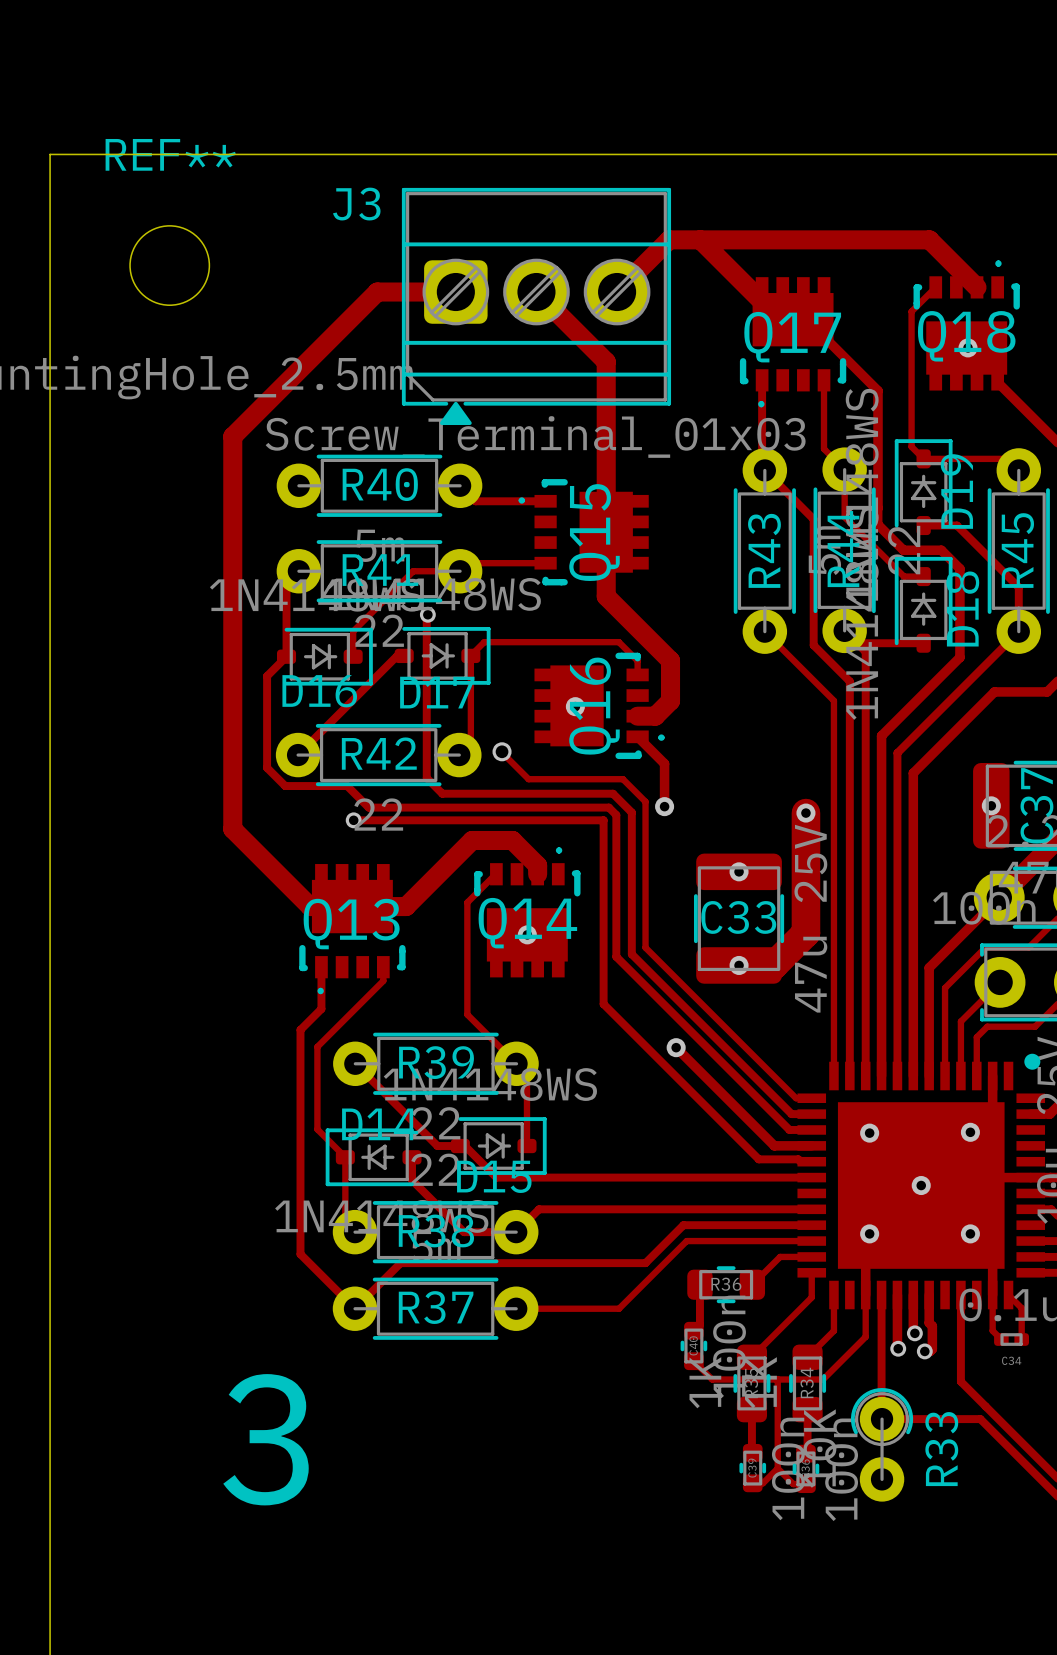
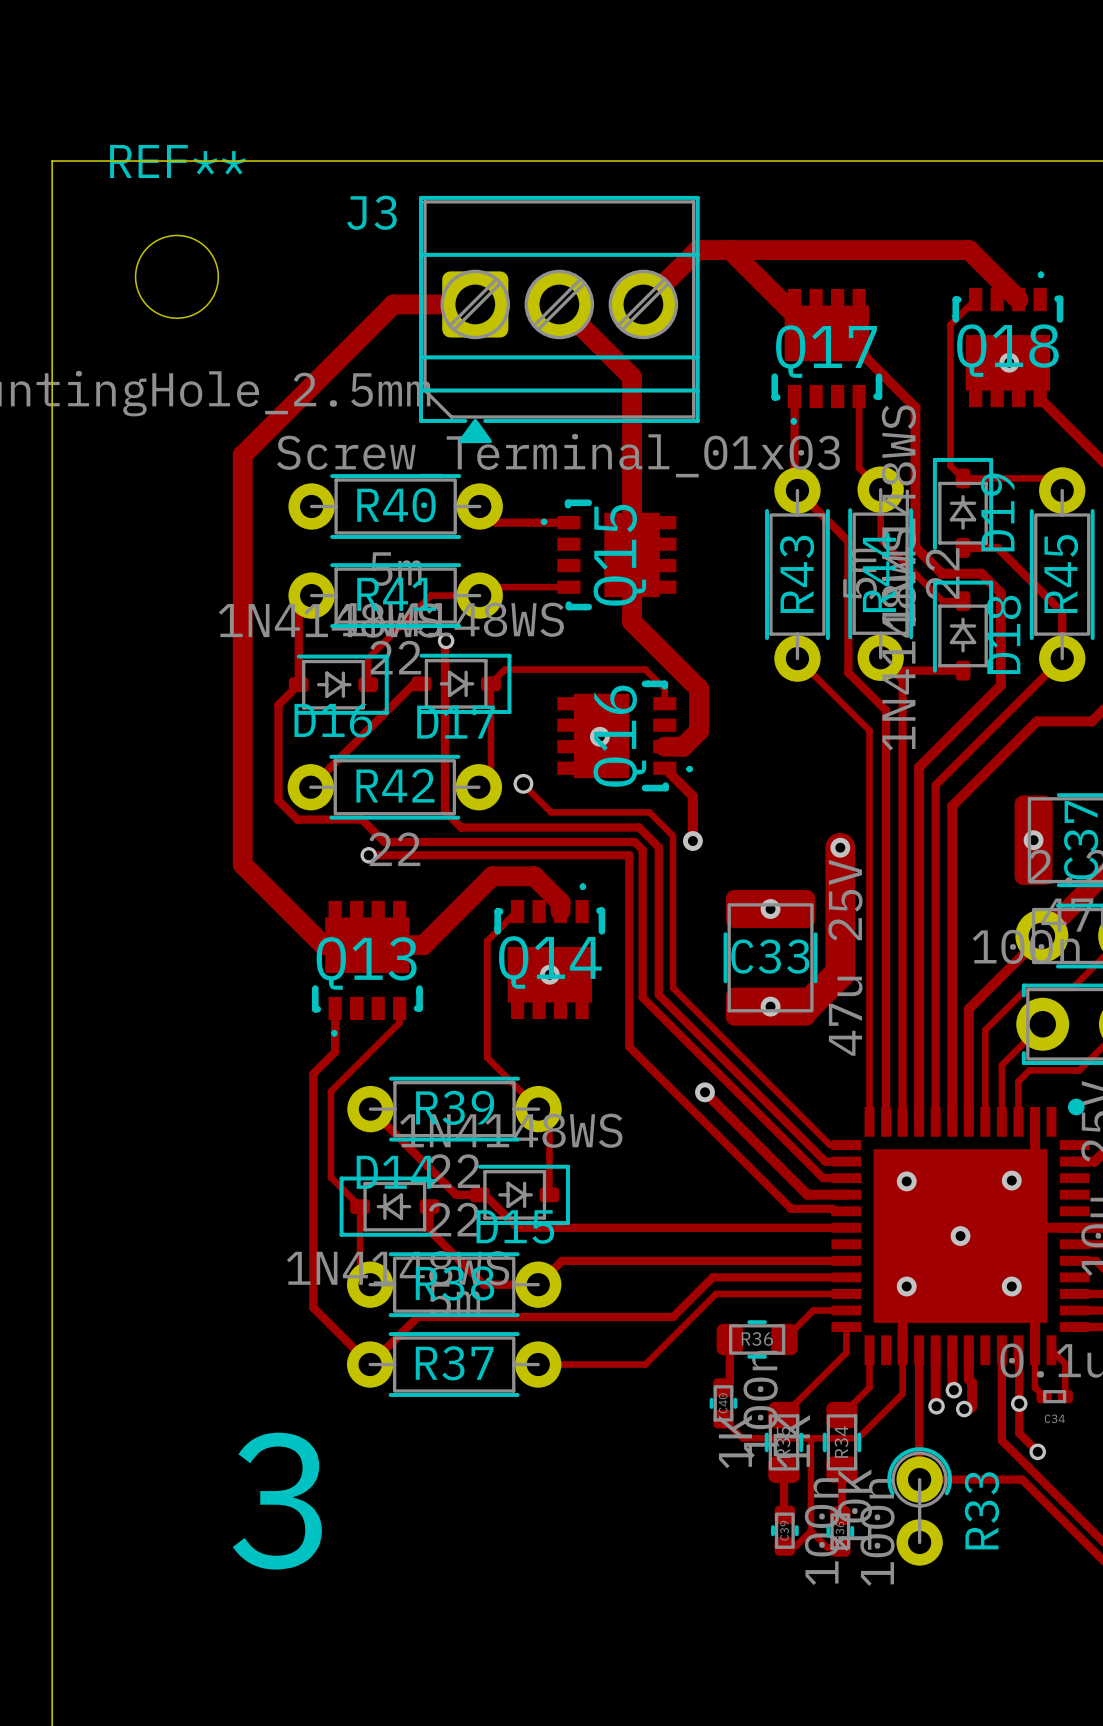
track: none -> (1018, 1350) (1019, 1433) (1037, 1451)
via: none -> (1019, 1403)
via: none -> (1037, 1451)

